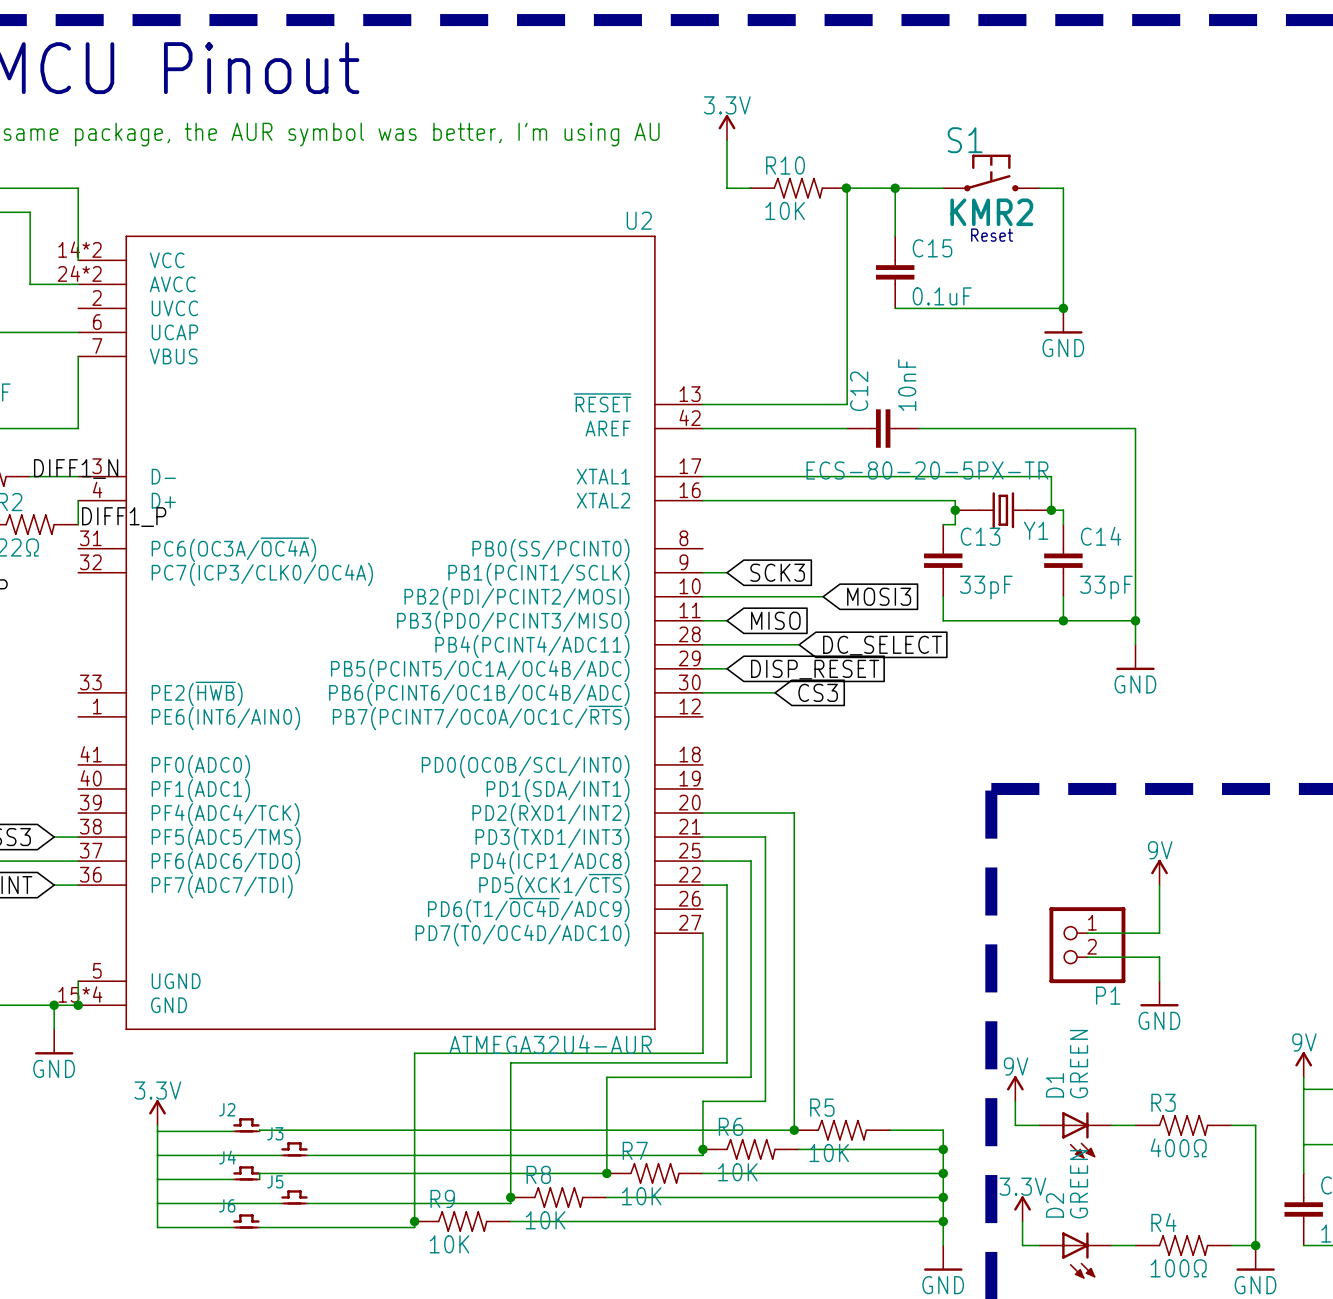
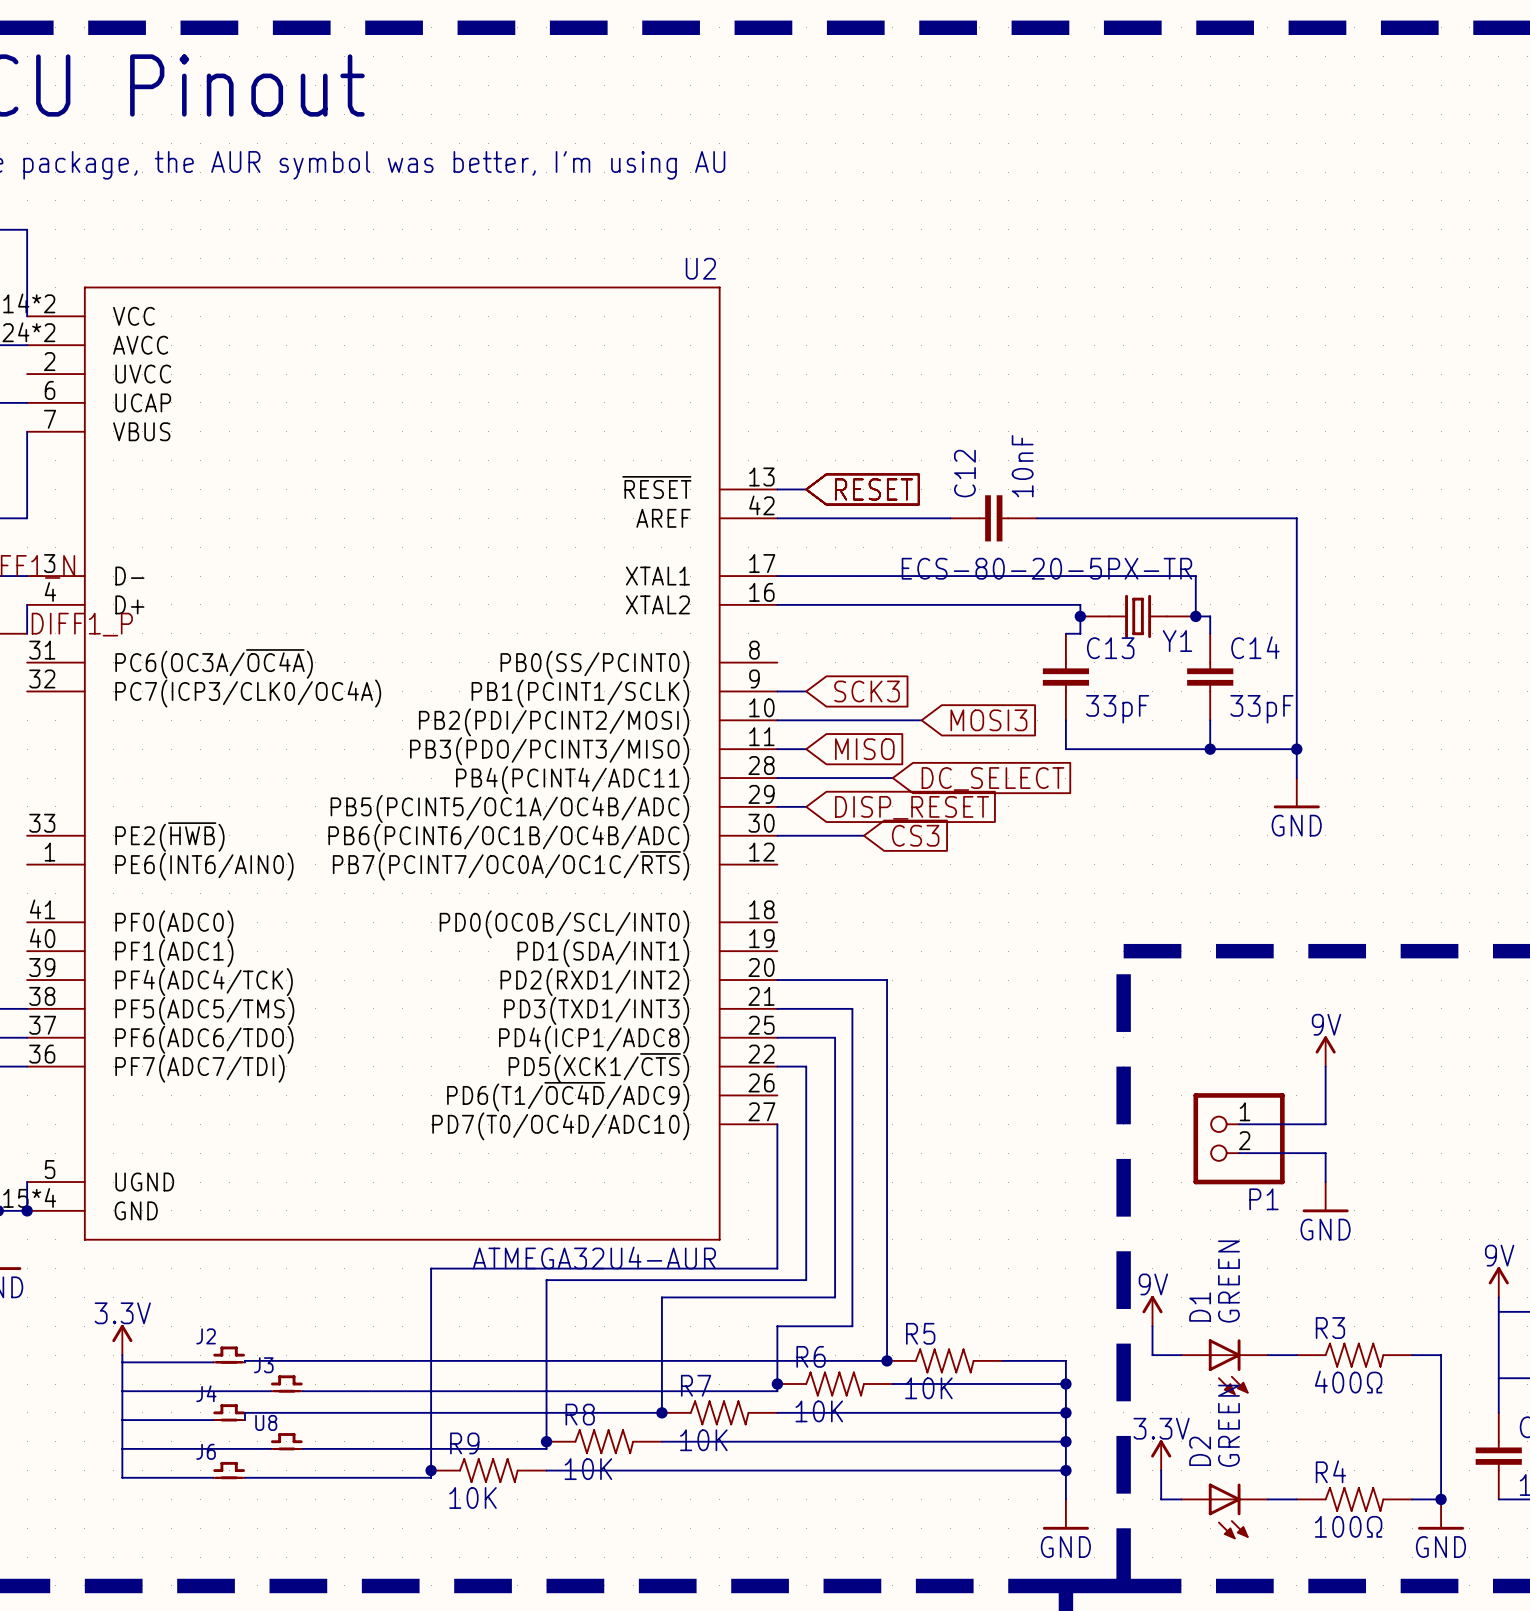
power symbol: 3.3V (727, 127) -> none
wire: (727, 140) (727, 188) (750, 188) -> none
S1: KMR2 (991, 173) -> none
R10: 10K (798, 188) -> none
wire: (846, 188) (895, 188) (895, 236) -> none
junction: (846, 188) -> none
wire: (847, 188) (847, 404) (727, 404) -> none
wire: (895, 188) (943, 188) -> none
junction: (895, 188) -> none
wire: (1039, 188) (1063, 188) (1063, 308) (895, 308) -> none
C15: 0.1uF (895, 272) -> none
junction: (1063, 308) -> none
power symbol: GND (1063, 321) -> none
global label: none -> RESET (873, 489)
J5 name: J5 (275, 1181) -> U8 (266, 1422)

